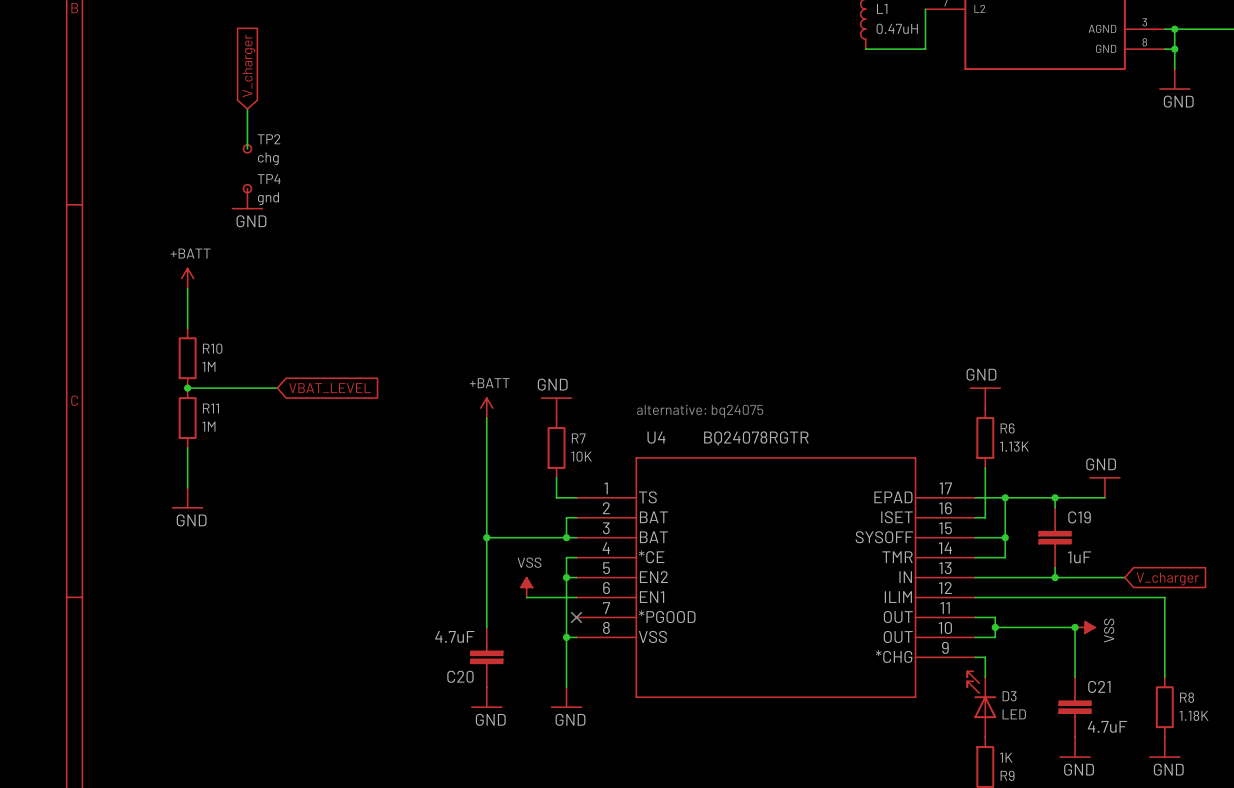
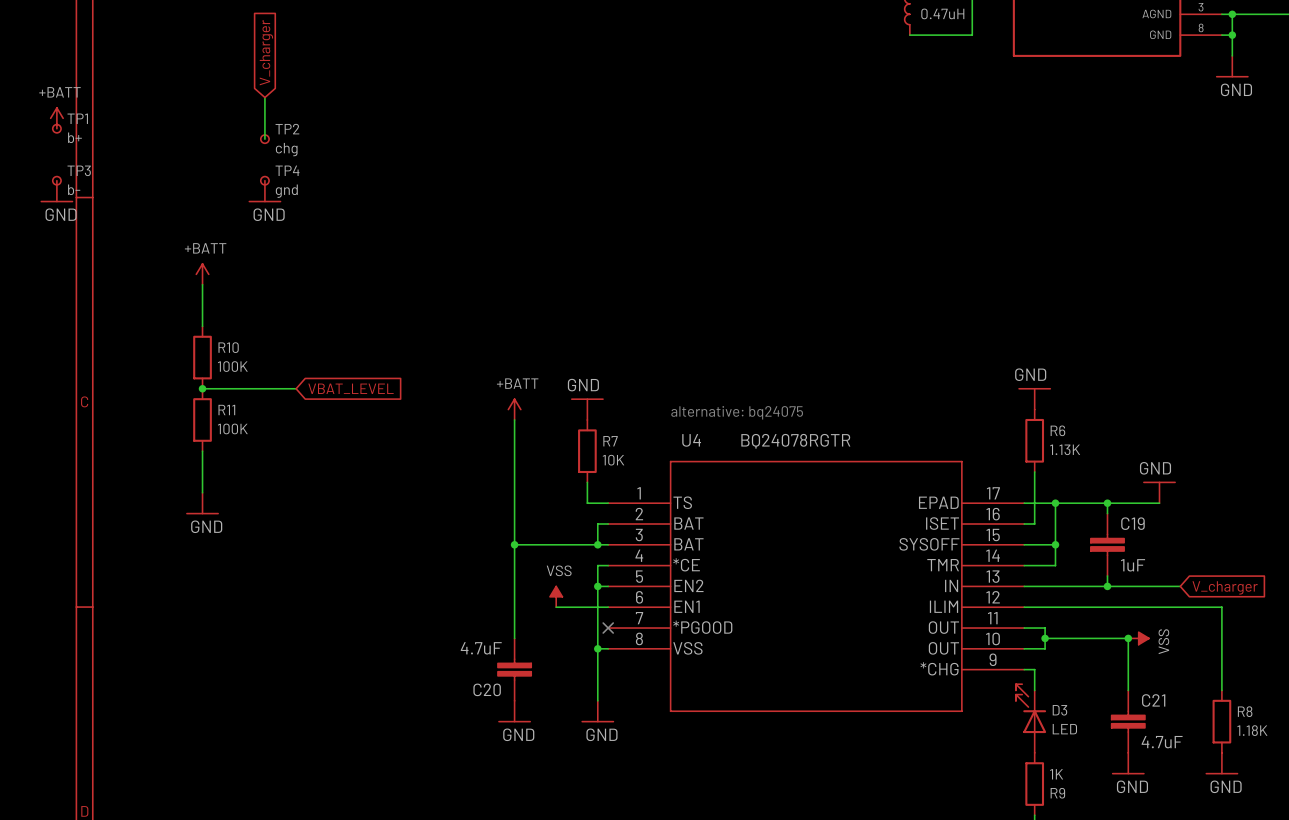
power symbol: none -> +BATT (56, 118)
TP1: none -> b+ (56, 128)
TP3: none -> b- (56, 180)
power symbol: none -> GND (56, 191)
R10 value: 1M (208, 366) -> 100K (232, 366)
R11 value: 1M (208, 426) -> 100K (232, 428)

